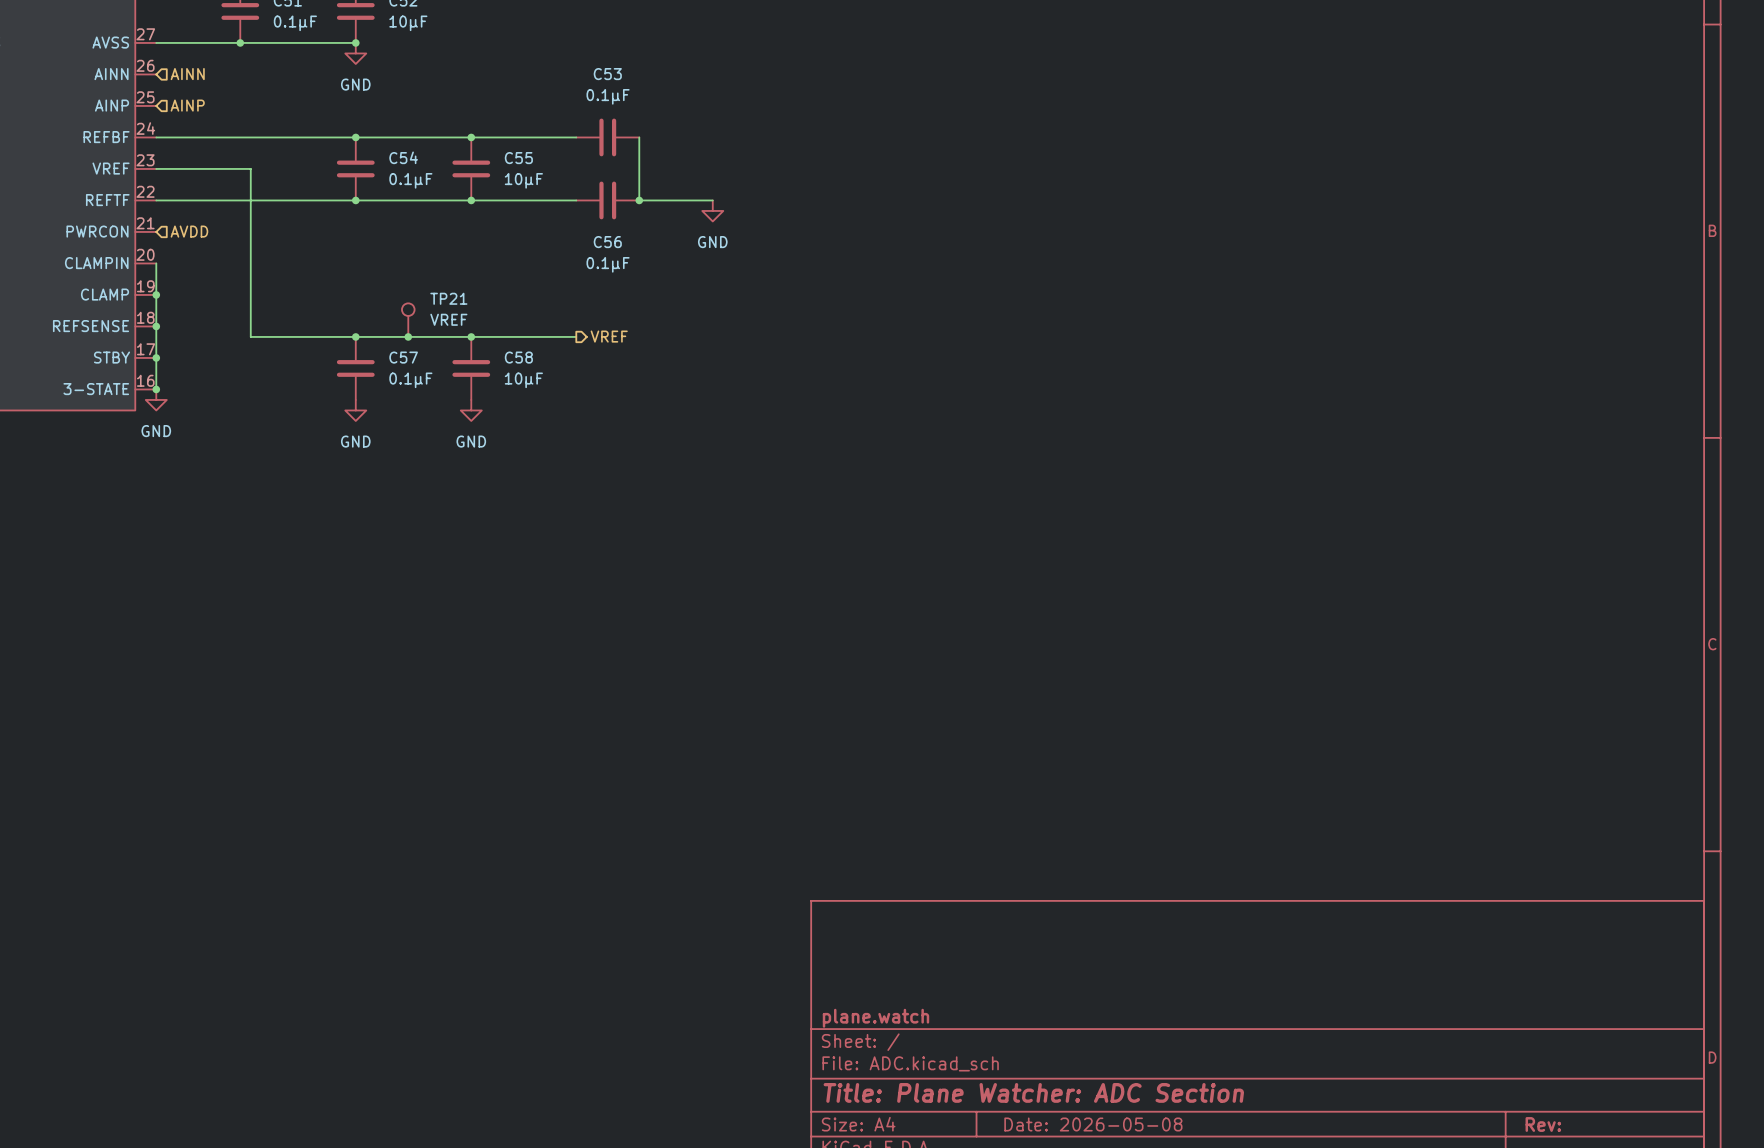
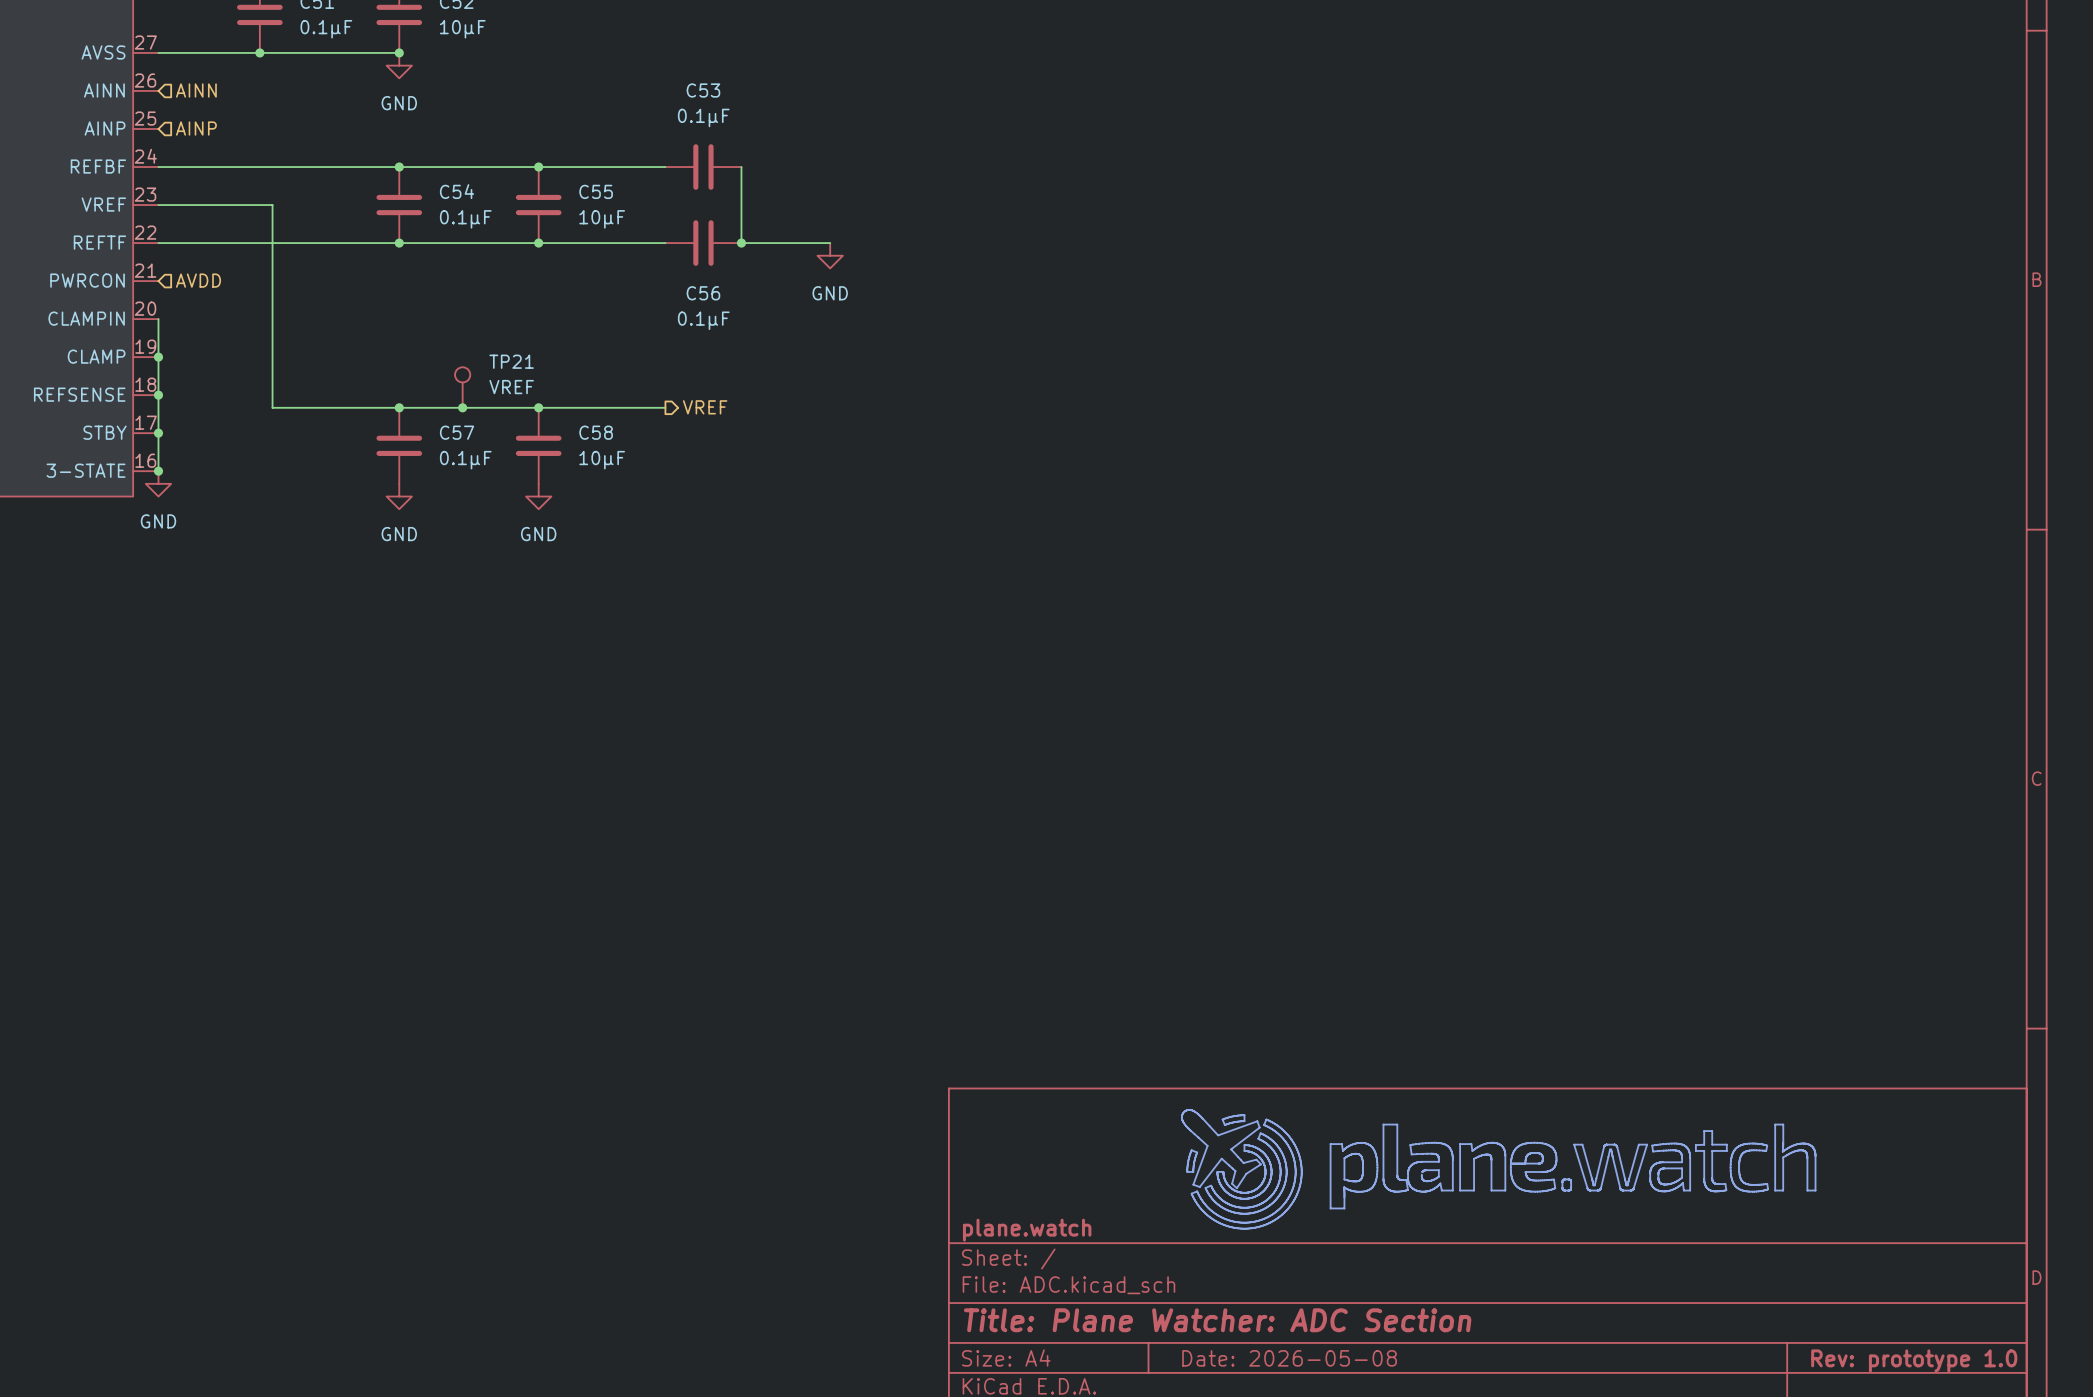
line: none -> (1188, 1109) (1182, 1114) (1183, 1121) (1207, 1145) (1193, 1184) (1199, 1187) (1221, 1158) (1235, 1171) (1232, 1183) (1236, 1188) (1246, 1173) (1260, 1164) (1256, 1159) (1243, 1163) (1231, 1149) (1259, 1127) (1257, 1121) (1218, 1135) (1198, 1114) (1188, 1109)
line: none -> (1243, 1115) (1231, 1116) (1222, 1119) (1224, 1125) (1244, 1121) (1243, 1115)
line: none -> (1266, 1119) (1264, 1125) (1281, 1136) (1293, 1156) (1295, 1174) (1291, 1192) (1283, 1205) (1272, 1214) (1259, 1220) (1244, 1222) (1232, 1221) (1219, 1216) (1206, 1205) (1197, 1191) (1191, 1193) (1204, 1212) (1221, 1223) (1243, 1228) (1265, 1224) (1283, 1213) (1296, 1194) (1301, 1171) (1297, 1150) (1284, 1131) (1266, 1119)
line: none -> (1383, 1124) (1397, 1124) (1397, 1176) (1399, 1179) (1406, 1180) (1406, 1190) (1392, 1191) (1384, 1184) (1383, 1124)
line: none -> (1775, 1124) (1775, 1190) (1783, 1190) (1783, 1157) (1800, 1150) (1805, 1151) (1807, 1155) (1807, 1190) (1815, 1190) (1813, 1148) (1808, 1144) (1800, 1143) (1782, 1151) (1783, 1124) (1775, 1124)
line: none -> (1704, 1131) (1704, 1144) (1695, 1145) (1695, 1150) (1704, 1150) (1705, 1184) (1712, 1190) (1726, 1190) (1725, 1184) (1715, 1183) (1712, 1181) (1712, 1150) (1726, 1150) (1726, 1144) (1712, 1144) (1712, 1131) (1704, 1131)
line: none -> (1260, 1133) (1258, 1138) (1270, 1147) (1278, 1160) (1280, 1173) (1277, 1186) (1264, 1201) (1245, 1207) (1234, 1206) (1224, 1201) (1216, 1194) (1211, 1185) (1205, 1187) (1214, 1201) (1227, 1210) (1243, 1213) (1259, 1210) (1273, 1202) (1283, 1188) (1286, 1172) (1283, 1156) (1275, 1143) (1260, 1133)
line: none -> (1360, 1142) (1350, 1145) (1342, 1150) (1341, 1144) (1330, 1144) (1330, 1208) (1344, 1208) (1344, 1187) (1353, 1191) (1363, 1191) (1370, 1189) (1374, 1183) (1377, 1167) (1375, 1152) (1369, 1144) (1360, 1142)
line: none -> (1431, 1142) (1410, 1145) (1411, 1154) (1435, 1154) (1438, 1156) (1438, 1161) (1419, 1161) (1412, 1164) (1408, 1171) (1409, 1184) (1413, 1189) (1420, 1191) (1431, 1190) (1440, 1183) (1441, 1190) (1452, 1190) (1451, 1150) (1444, 1144) (1431, 1142)
line: none -> (1491, 1142) (1482, 1144) (1472, 1150) (1471, 1144) (1460, 1144) (1460, 1190) (1474, 1190) (1474, 1158) (1486, 1154) (1491, 1157) (1491, 1190) (1505, 1190) (1504, 1150) (1500, 1144) (1491, 1142)
line: none -> (1674, 1143) (1652, 1145) (1653, 1151) (1676, 1150) (1681, 1155) (1682, 1162) (1660, 1162) (1652, 1166) (1650, 1182) (1658, 1190) (1671, 1190) (1682, 1183) (1683, 1190) (1690, 1190) (1689, 1151) (1683, 1145) (1674, 1143)
line: none -> (1752, 1143) (1740, 1145) (1733, 1152) (1730, 1164) (1732, 1180) (1736, 1187) (1744, 1190) (1768, 1189) (1767, 1183) (1747, 1184) (1740, 1177) (1739, 1162) (1742, 1153) (1750, 1150) (1766, 1150) (1767, 1145) (1752, 1143)
line: none -> (1244, 1145) (1244, 1151) (1256, 1154) (1264, 1164) (1265, 1176) (1259, 1186) (1249, 1192) (1237, 1191) (1227, 1183) (1223, 1171) (1217, 1171) (1219, 1182) (1225, 1190) (1234, 1196) (1244, 1198) (1254, 1196) (1263, 1190) (1269, 1182) (1271, 1171) (1269, 1161) (1263, 1152) (1254, 1147) (1244, 1145)
line: none -> (1607, 1144) (1614, 1144)
line: none -> (1617, 1146) (1627, 1185) (1638, 1144) (1647, 1144) (1633, 1188)
line: none -> (1604, 1147) (1593, 1185) (1582, 1144) (1574, 1144) (1587, 1188)
line: none -> (1191, 1150) (1188, 1160) (1187, 1171) (1193, 1171) (1197, 1152) (1191, 1150)
line: none -> (1355, 1153) (1359, 1154) (1362, 1158) (1361, 1177) (1357, 1181) (1344, 1179) (1344, 1158) (1355, 1153)
line: none -> (1510, 1163) (1512, 1179) (1519, 1188) (1535, 1191) (1555, 1188) (1553, 1179) (1531, 1180) (1527, 1177) (1525, 1172) (1546, 1171) (1553, 1168) (1556, 1155) (1549, 1145) (1534, 1142) (1520, 1145) (1513, 1151) (1510, 1163)
line: none -> (1510, 1163) (1538, 1163) (1540, 1163) (1542, 1161) (1542, 1155) (1537, 1153) (1529, 1153) (1526, 1156) (1525, 1159) (1525, 1160) (1525, 1162) (1525, 1163)
line: none -> (1663, 1168) (1682, 1168) (1682, 1177) (1671, 1183) (1661, 1183) (1658, 1180) (1658, 1173) (1663, 1168)
line: none -> (1423, 1171) (1438, 1170) (1438, 1176) (1425, 1181) (1422, 1179) (1421, 1174)
line: none -> (1564, 1179) (1568, 1179)
line: none -> (1562, 1181) (1562, 1188)
line: none -> (1571, 1181) (1571, 1188)
line: none -> (1601, 1188) (1610, 1149) (1620, 1188)
line: none -> (1588, 1189) (1597, 1190)
line: none -> (1564, 1190) (1568, 1190)
line: none -> (1623, 1190) (1630, 1190)
title block: Rev: (1543, 1124) -> Rev: prototype 1.0 (1914, 1360)

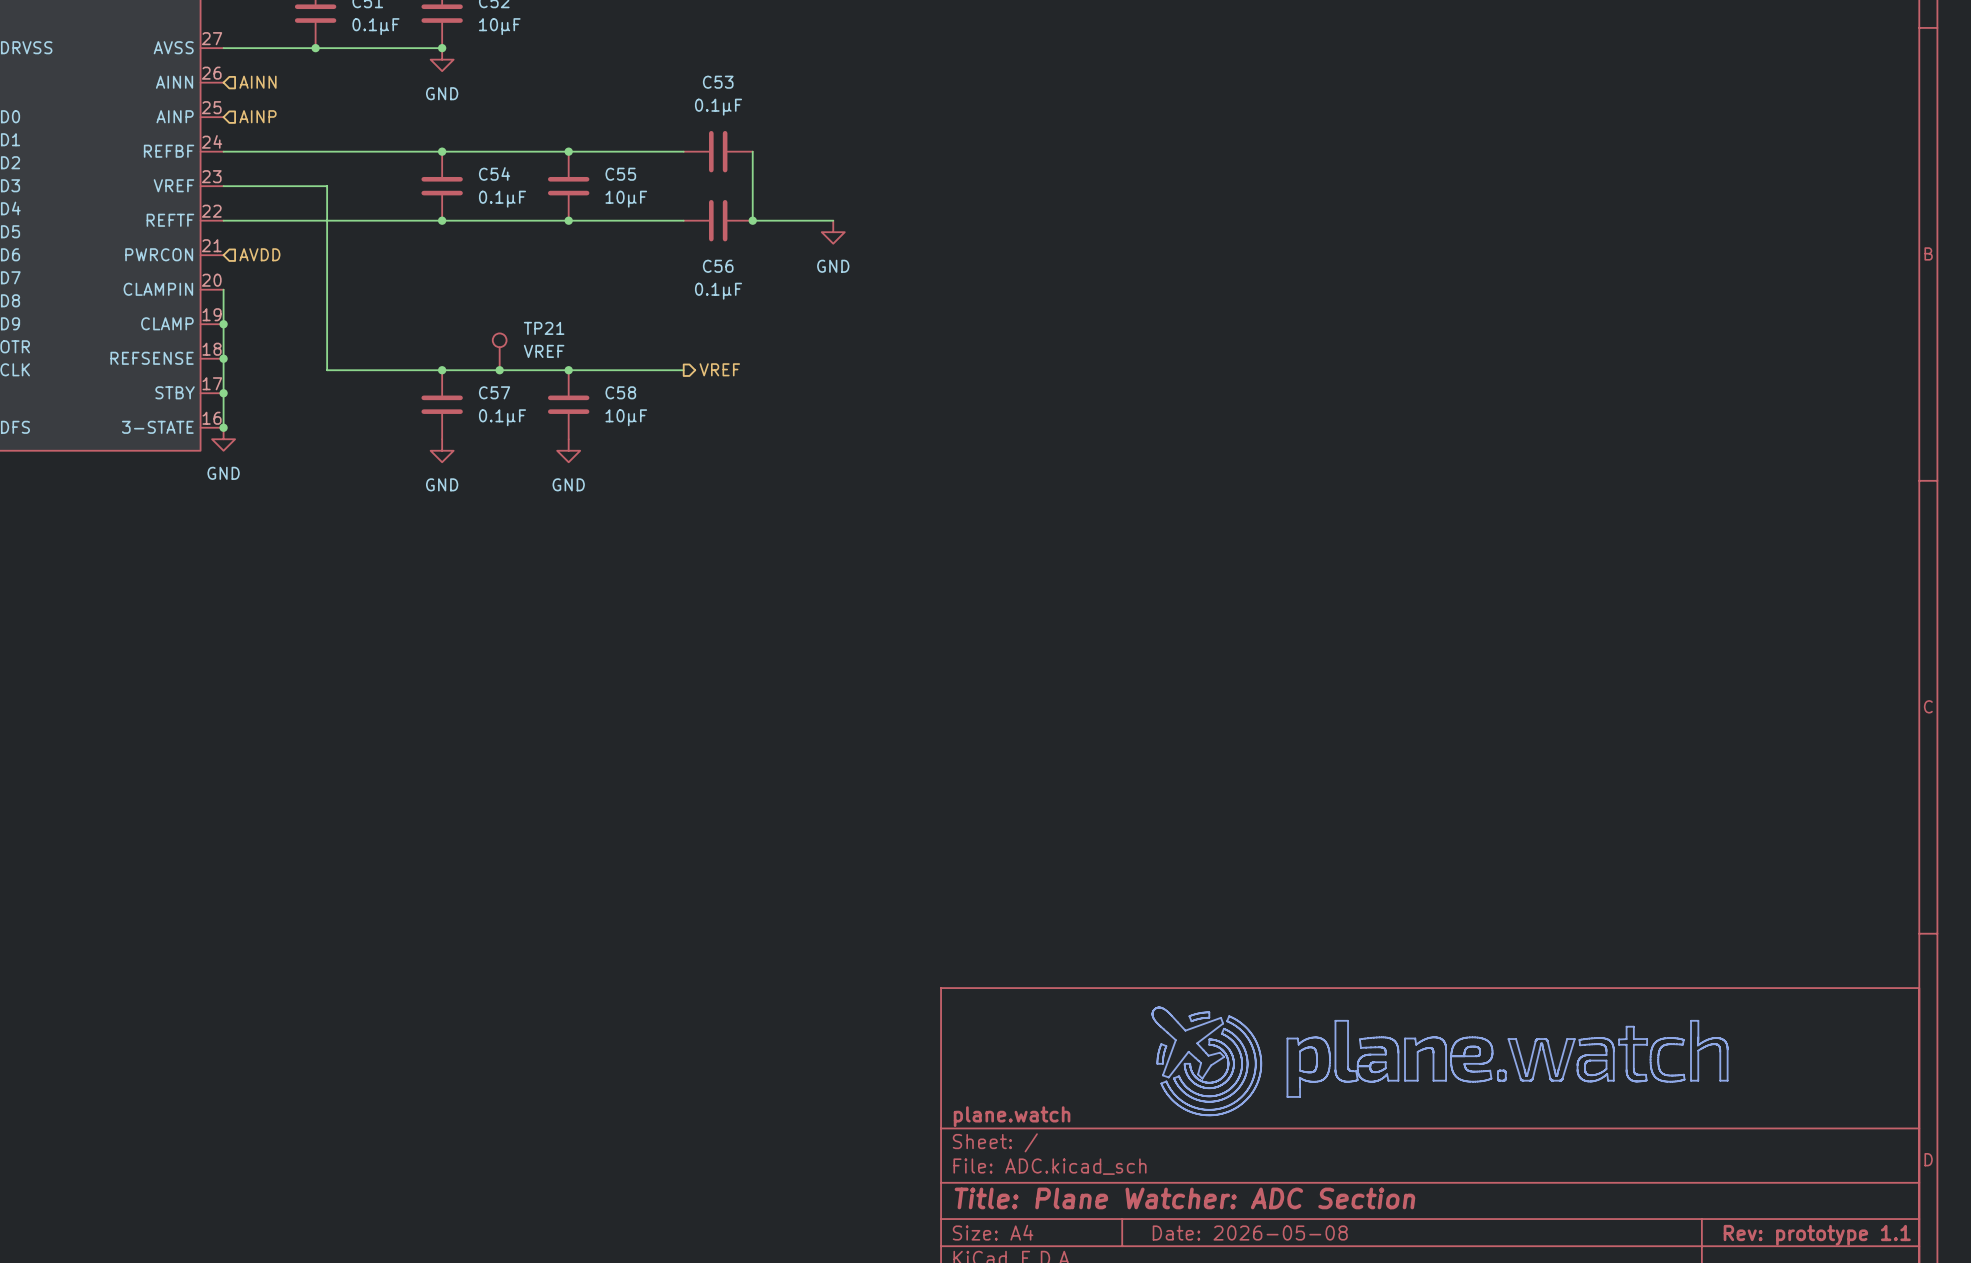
line: none -> (1370, 1064) (1370, 1066) (1357, 1066)
title block: Rev: prototype 1.0 (1914, 1360) -> Rev: prototype 1.1 (1817, 1235)

